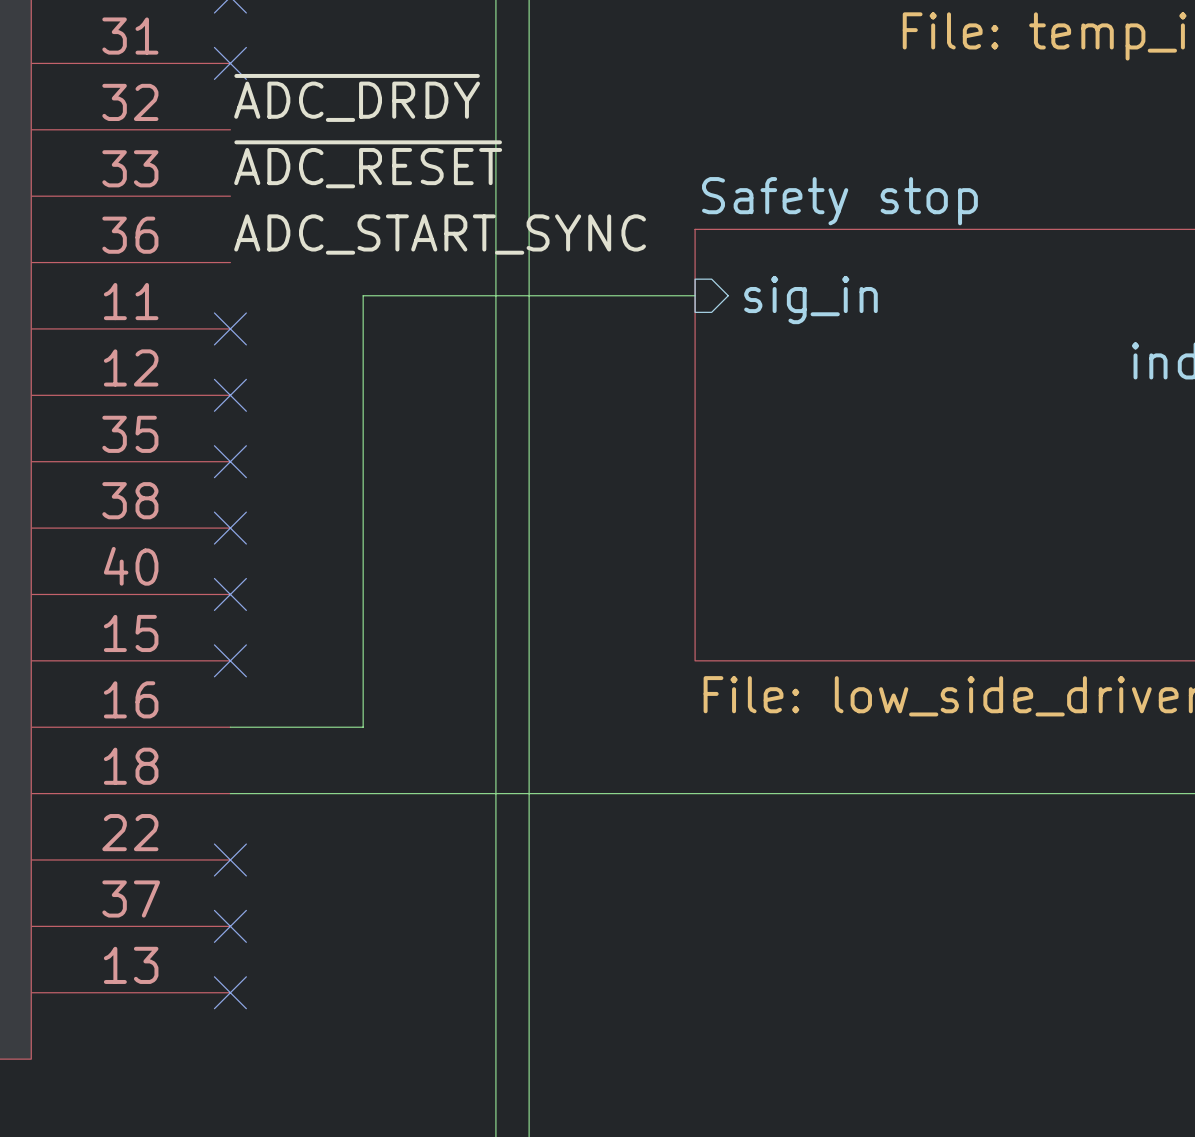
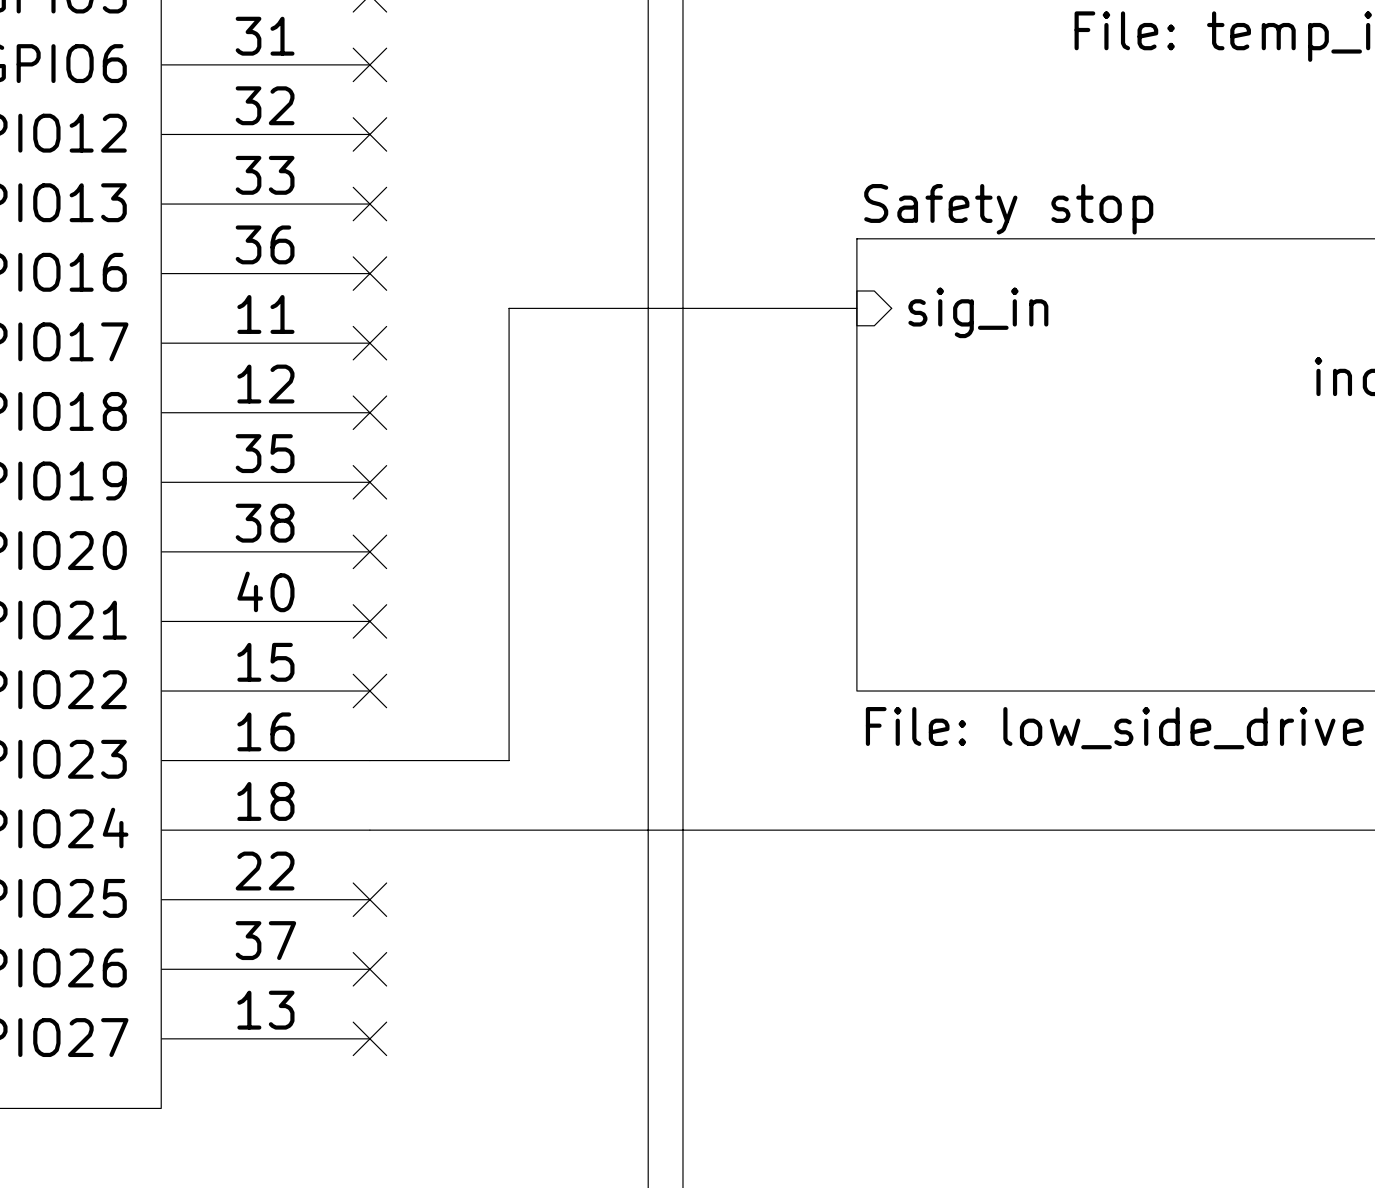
label: ~{ADC_DRDY} (357, 97) -> none
no-connect mark: none -> (369, 134)
label: ~{ADC_RESET} (368, 164) -> none
no-connect mark: none -> (369, 204)
label: ADC_START_SYNC (440, 234) -> none
no-connect mark: none -> (369, 273)

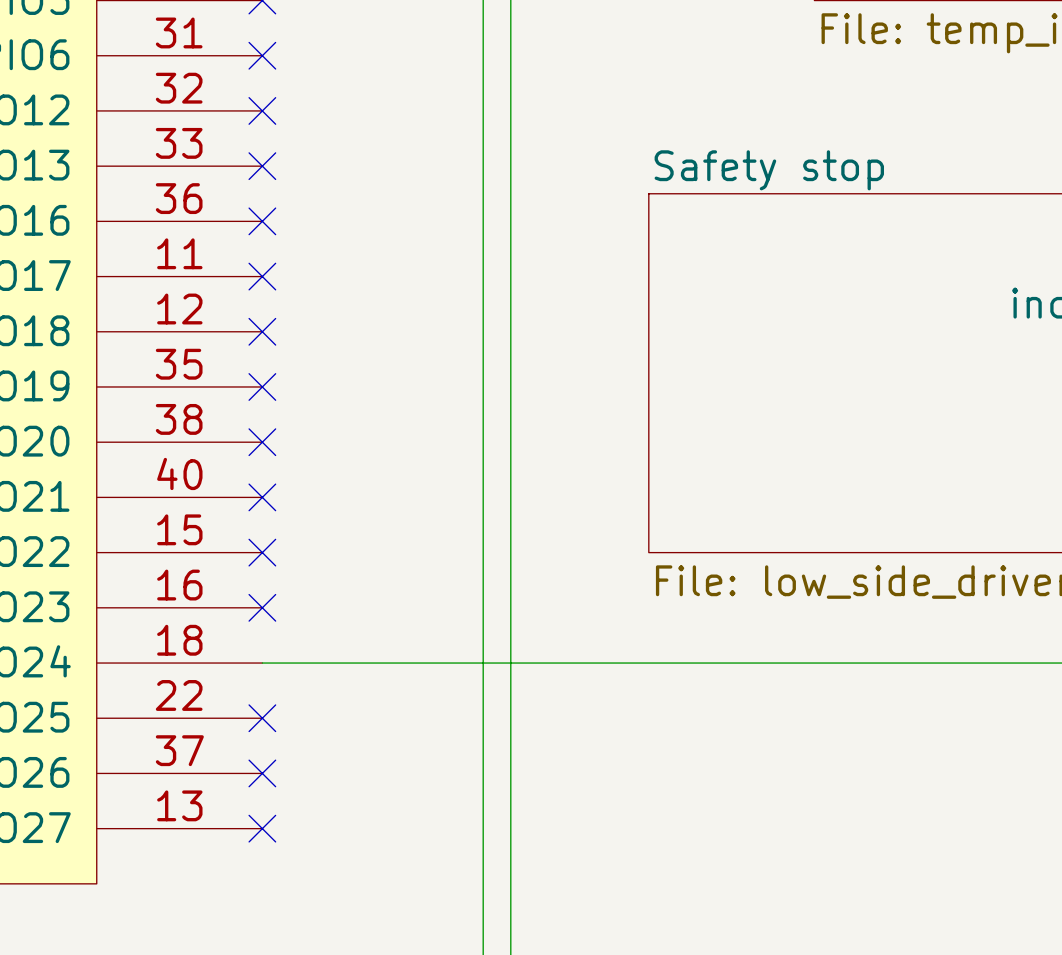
wire: (856, 308) (509, 308) (509, 760) (369, 760) -> none
sheet pin: sig_in (978, 312) -> none
no-connect mark: none -> (262, 607)

